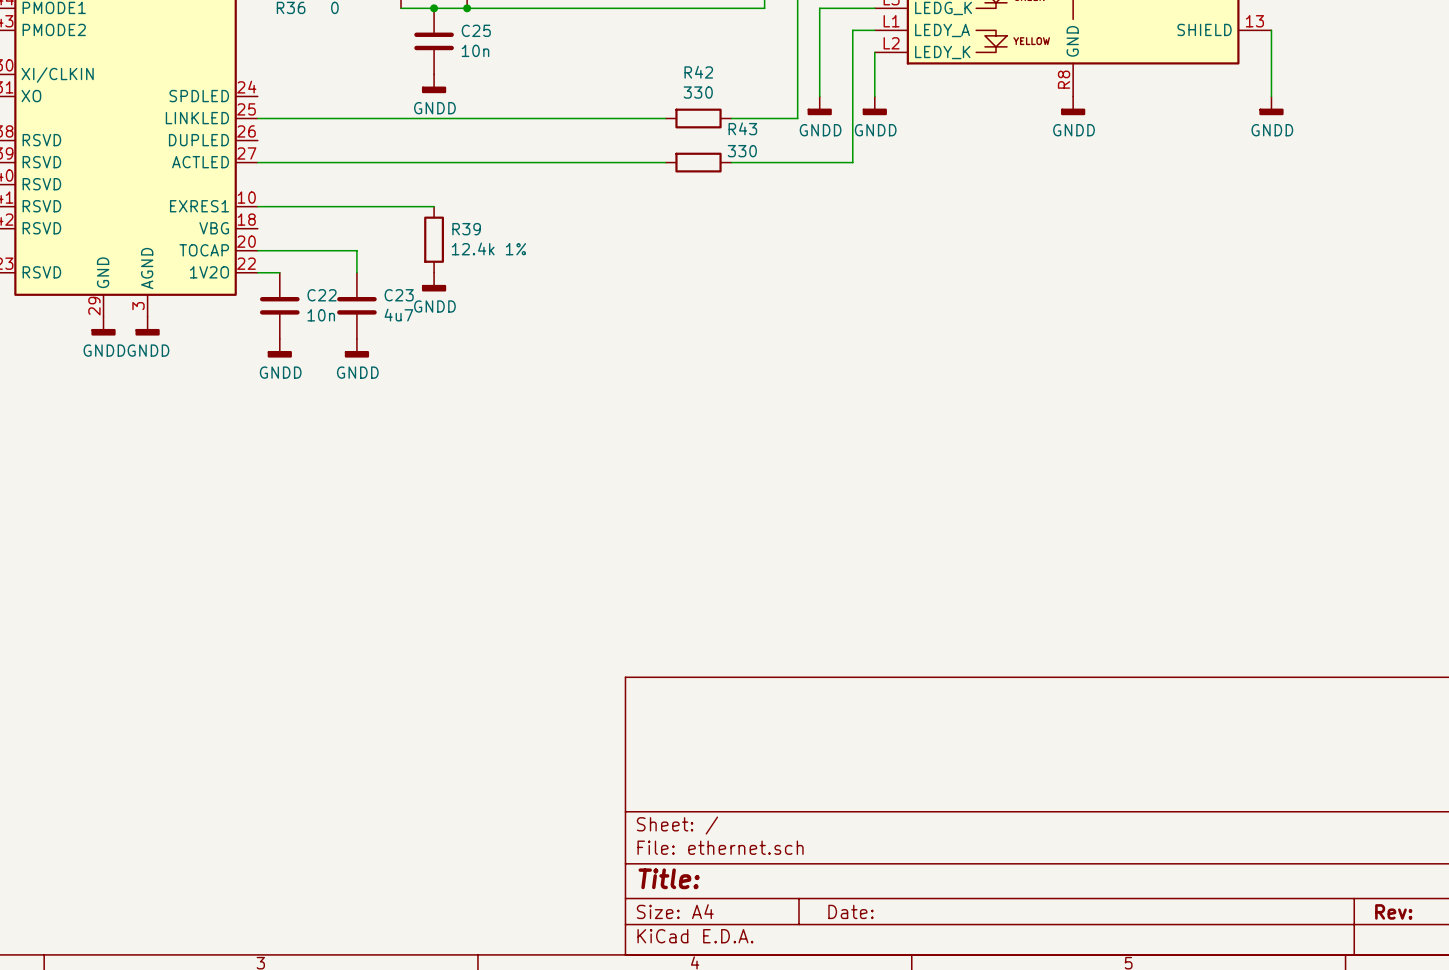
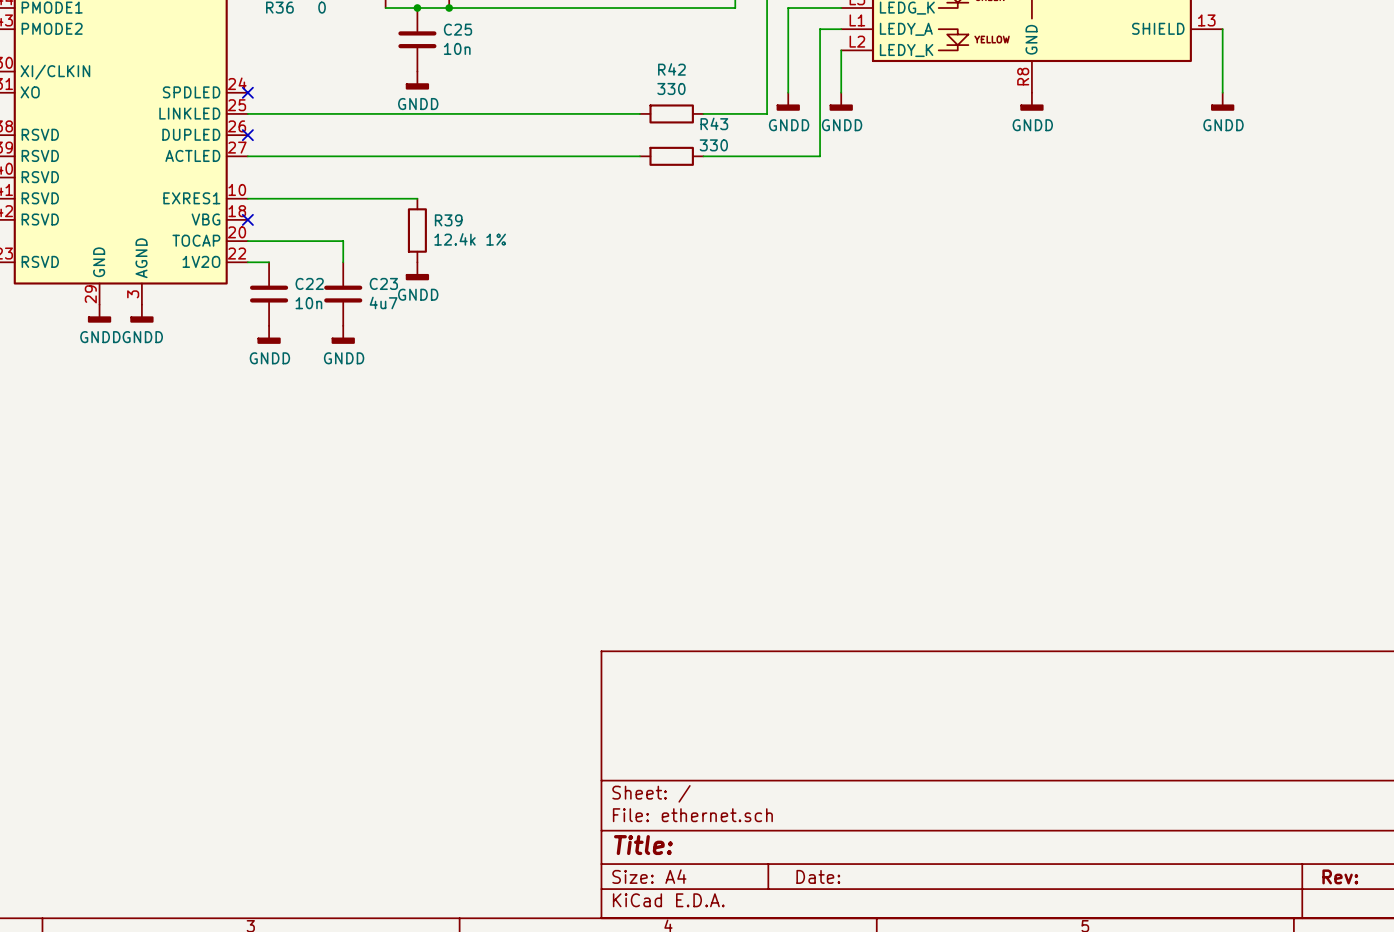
no-connect mark: none -> (247, 92)
no-connect mark: none -> (247, 135)
no-connect mark: none -> (247, 219)

